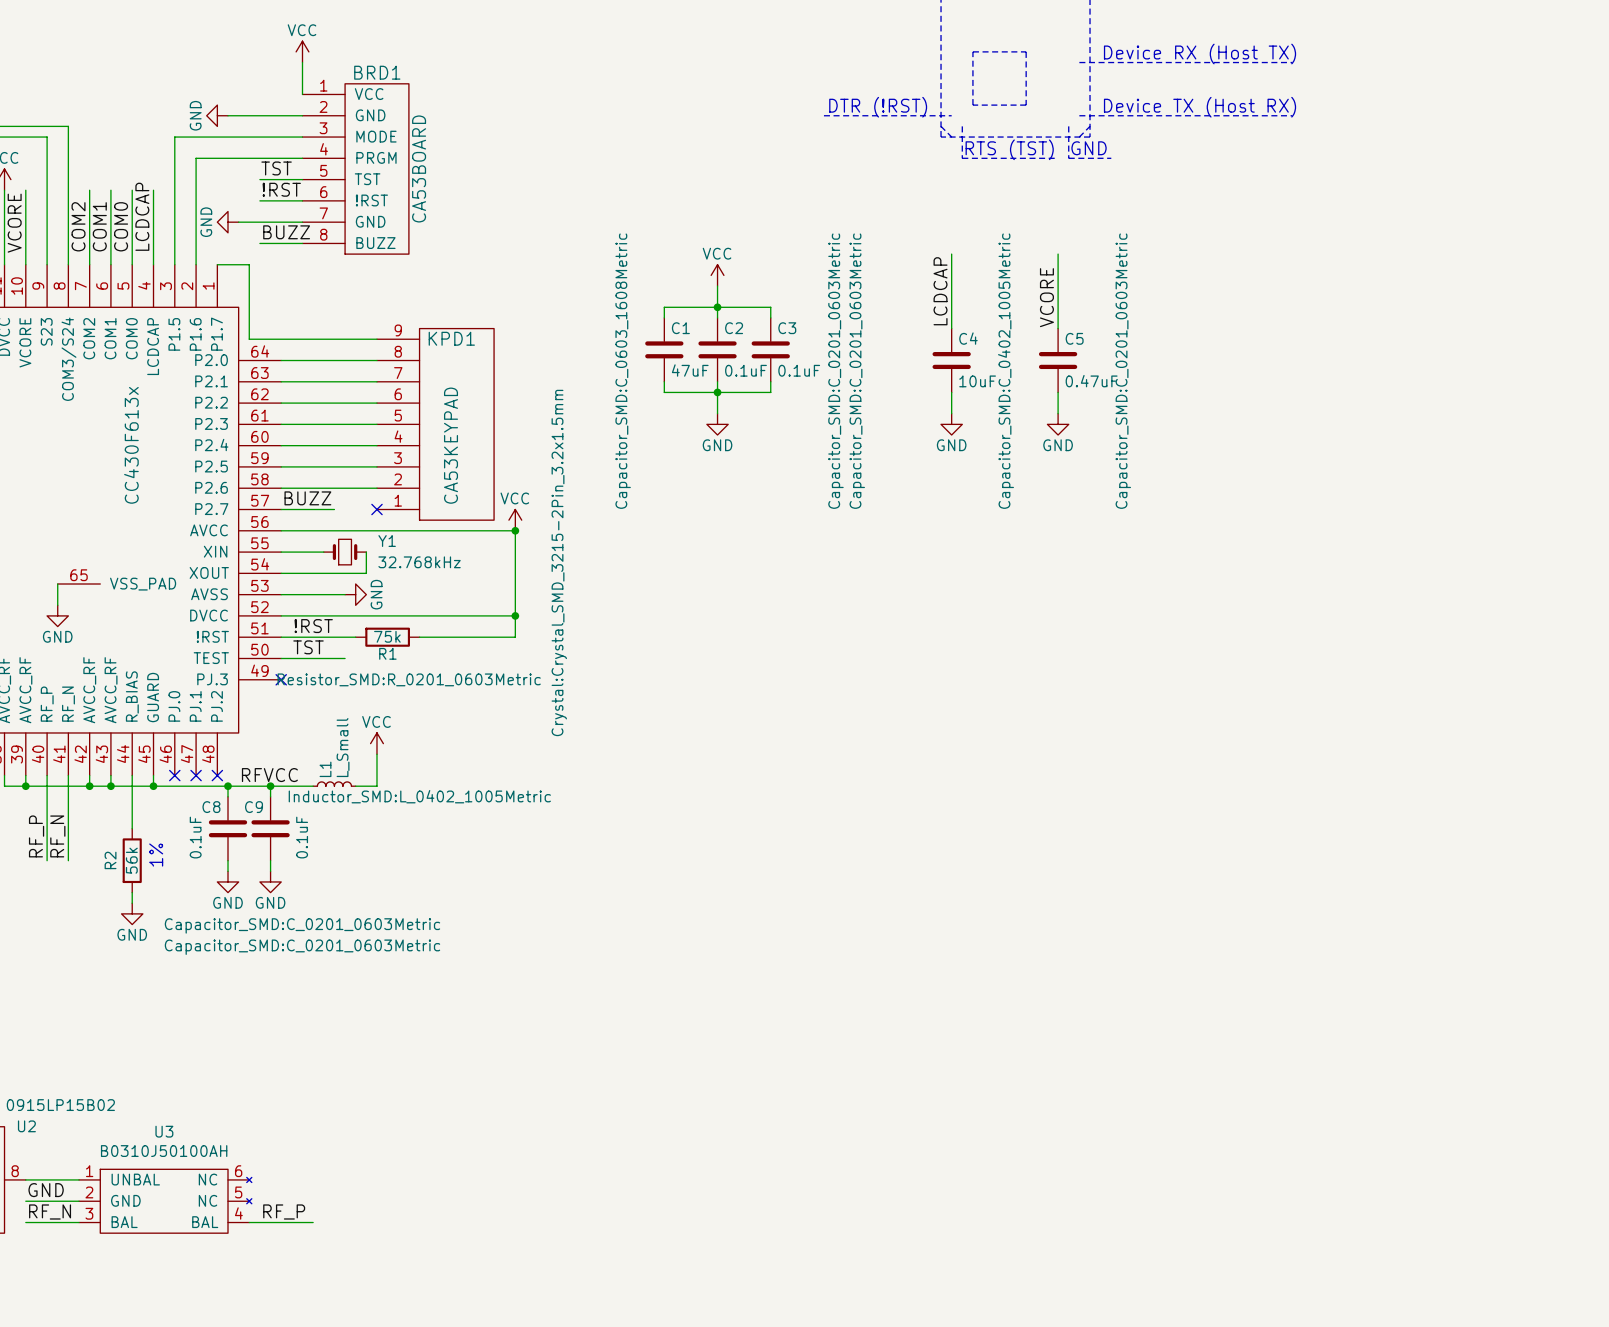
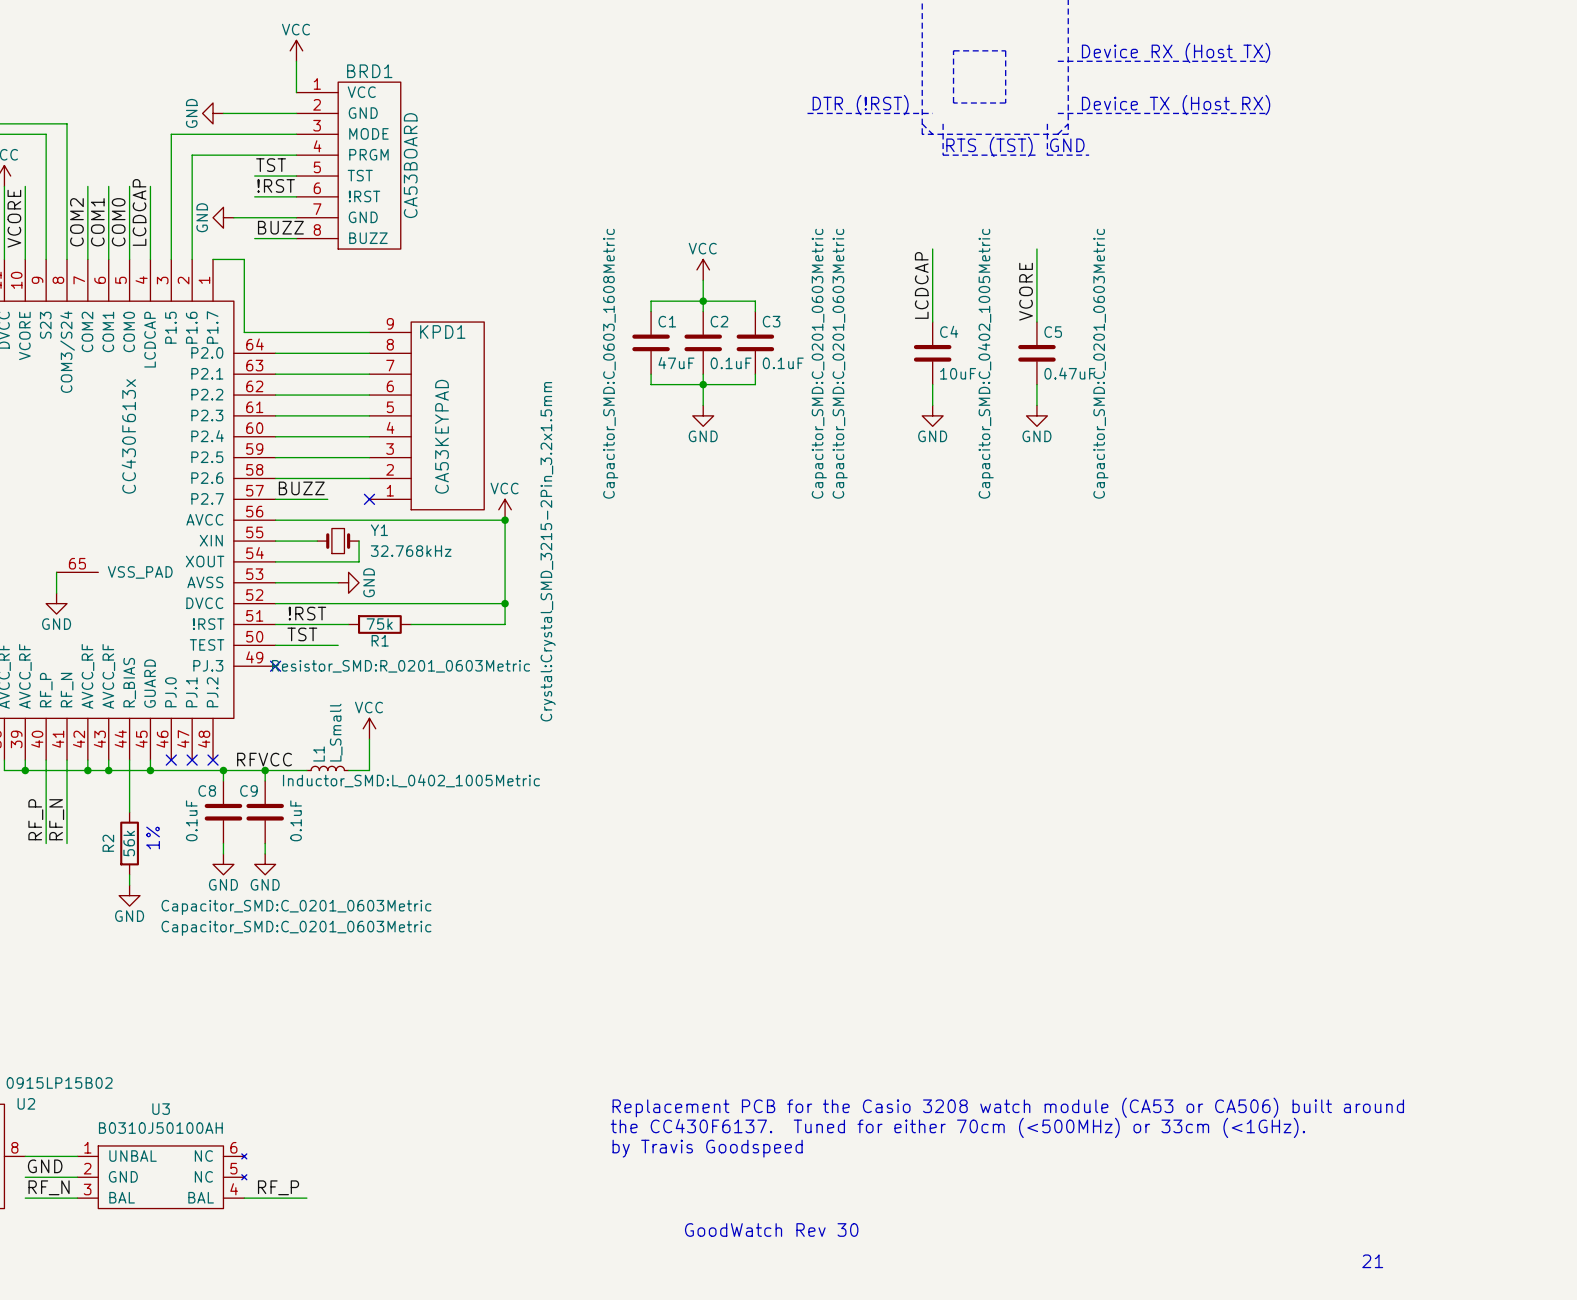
text: none -> Replacement PCB for the Casio 3208 watch module (CA53 or CA506) built around (1008, 1107)
text: none -> the CC430F6137. Tuned for either 70cm (<500MHz) or 33cm (<1GHz). (957, 1127)
text: none -> by Travis Goodspeed (707, 1148)
text: none -> GoodWatch Rev 30 (771, 1230)
text: none -> 21 (1372, 1261)

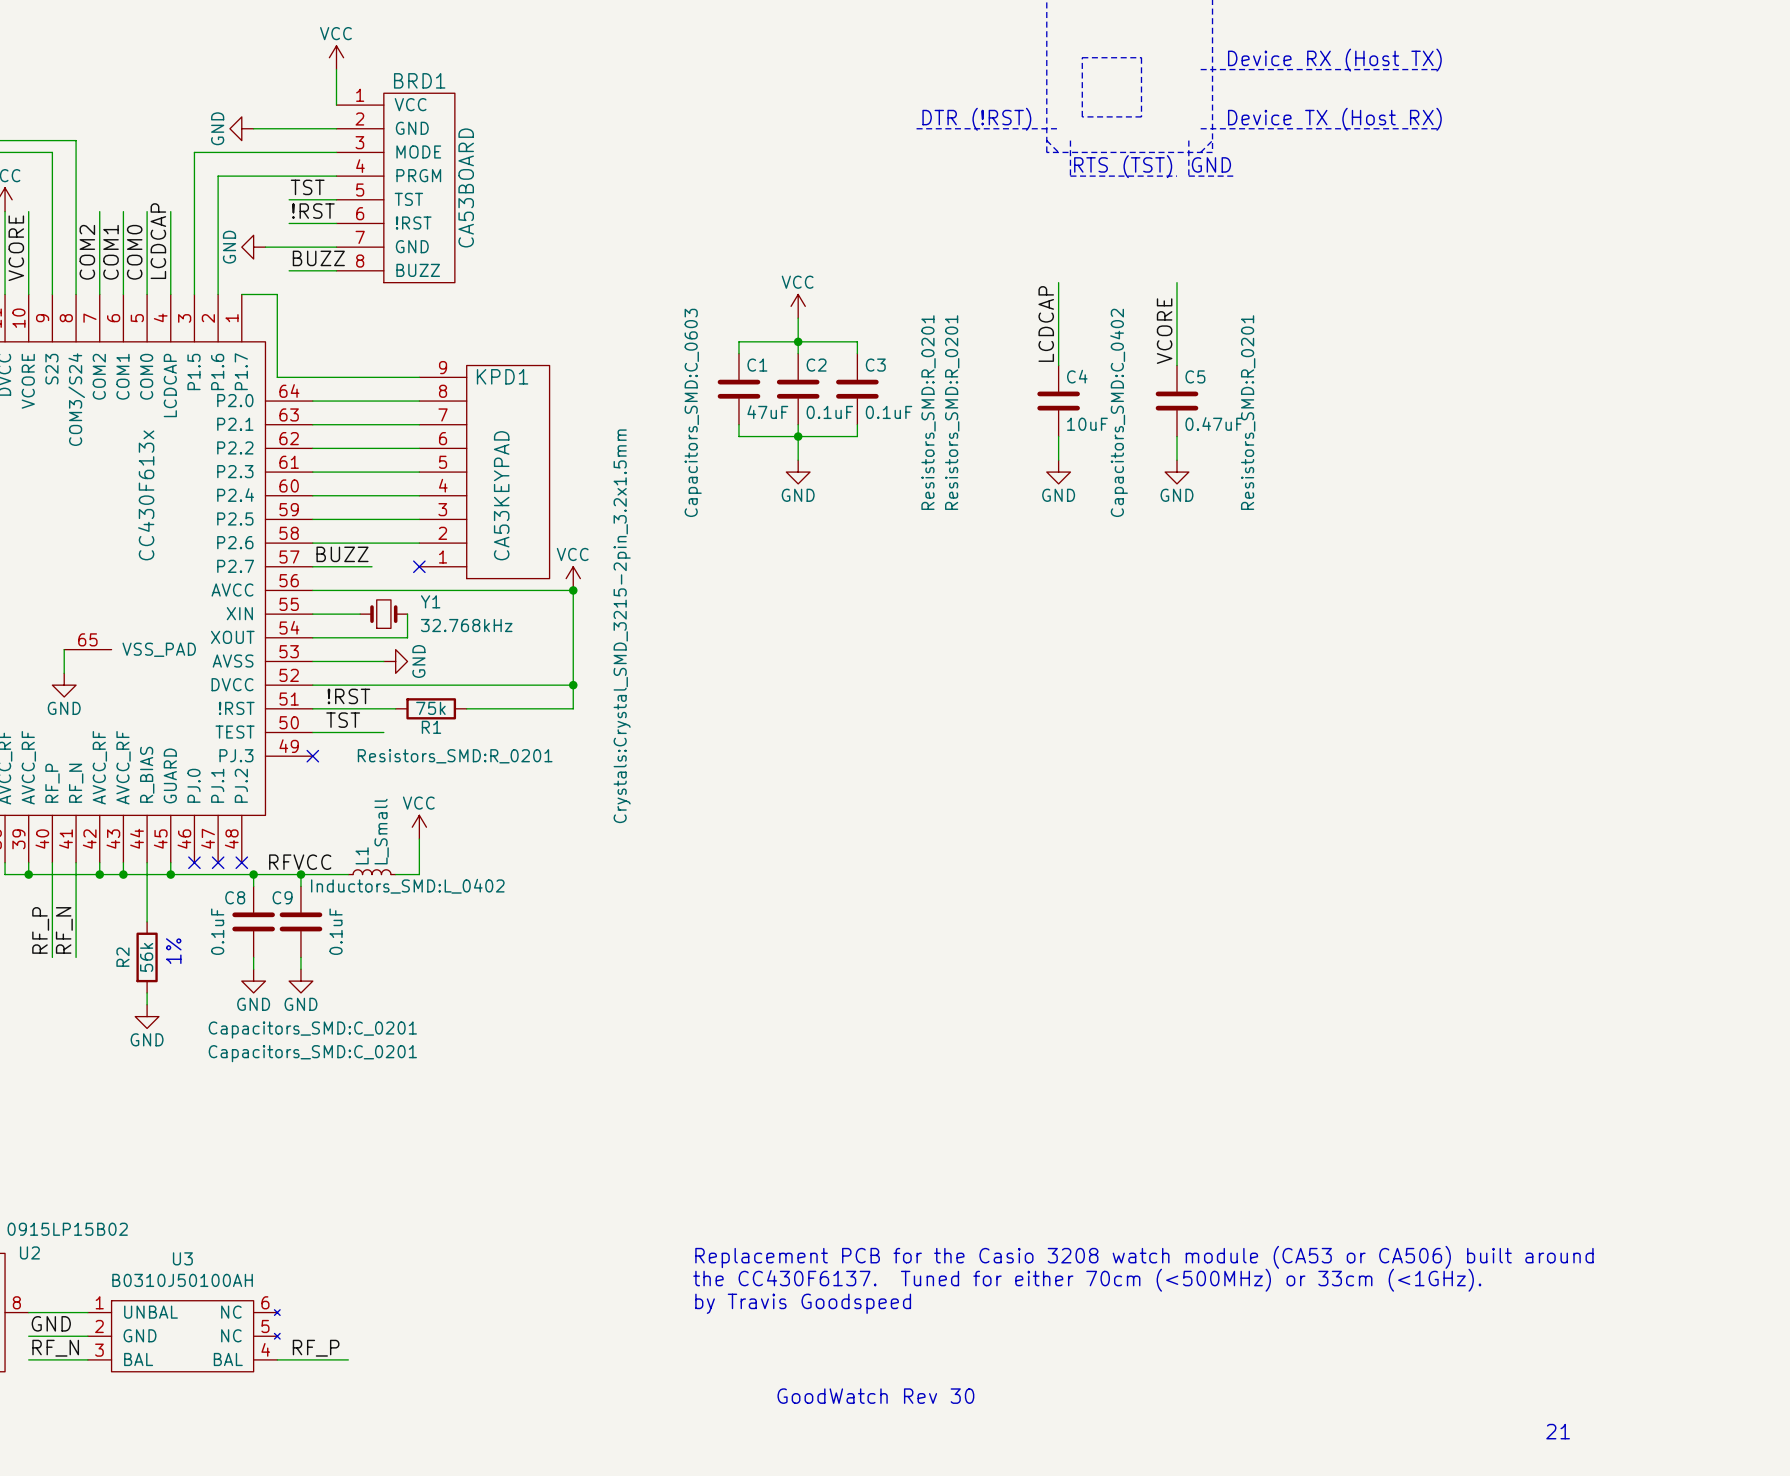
C1 text: Capacitor_SMD:C_0603_1608Metric (610, 363) -> Capacitors_SMD:C_0603 (693, 412)
C2 text: Capacitor_SMD:C_0201_0603Metric (819, 363) -> Resistors_SMD:R_0201 (928, 412)
C3 text: Capacitor_SMD:C_0201_0603Metric (840, 363) -> Resistors_SMD:R_0201 (952, 412)
C4 text: Capacitor_SMD:C_0402_1005Metric (985, 363) -> Capacitors_SMD:C_0402 (1119, 412)
C5 text: Capacitor_SMD:C_0201_0603Metric (1100, 363) -> Resistors_SMD:R_0201 (1248, 412)
Y1 text: Crystal:Crystal_SMD_3215-2Pin_3.2x1.5mm (548, 551) -> Crystals:Crystal_SMD_3215-2pin_3.2x1.5mm (622, 626)
R1 text: Resistor_SMD:R_0201_0603Metric (401, 666) -> Resistors_SMD:R_0201 (455, 756)
L1 text: Inductor_SMD:L_0402_1005Metric (411, 780) -> Inductors_SMD:L_0402 (407, 886)
C9 text: Capacitor_SMD:C_0201_0603Metric (296, 907) -> Capacitors_SMD:C_0201 (312, 1029)
C8 text: Capacitor_SMD:C_0201_0603Metric (296, 928) -> Capacitors_SMD:C_0201 (312, 1053)

